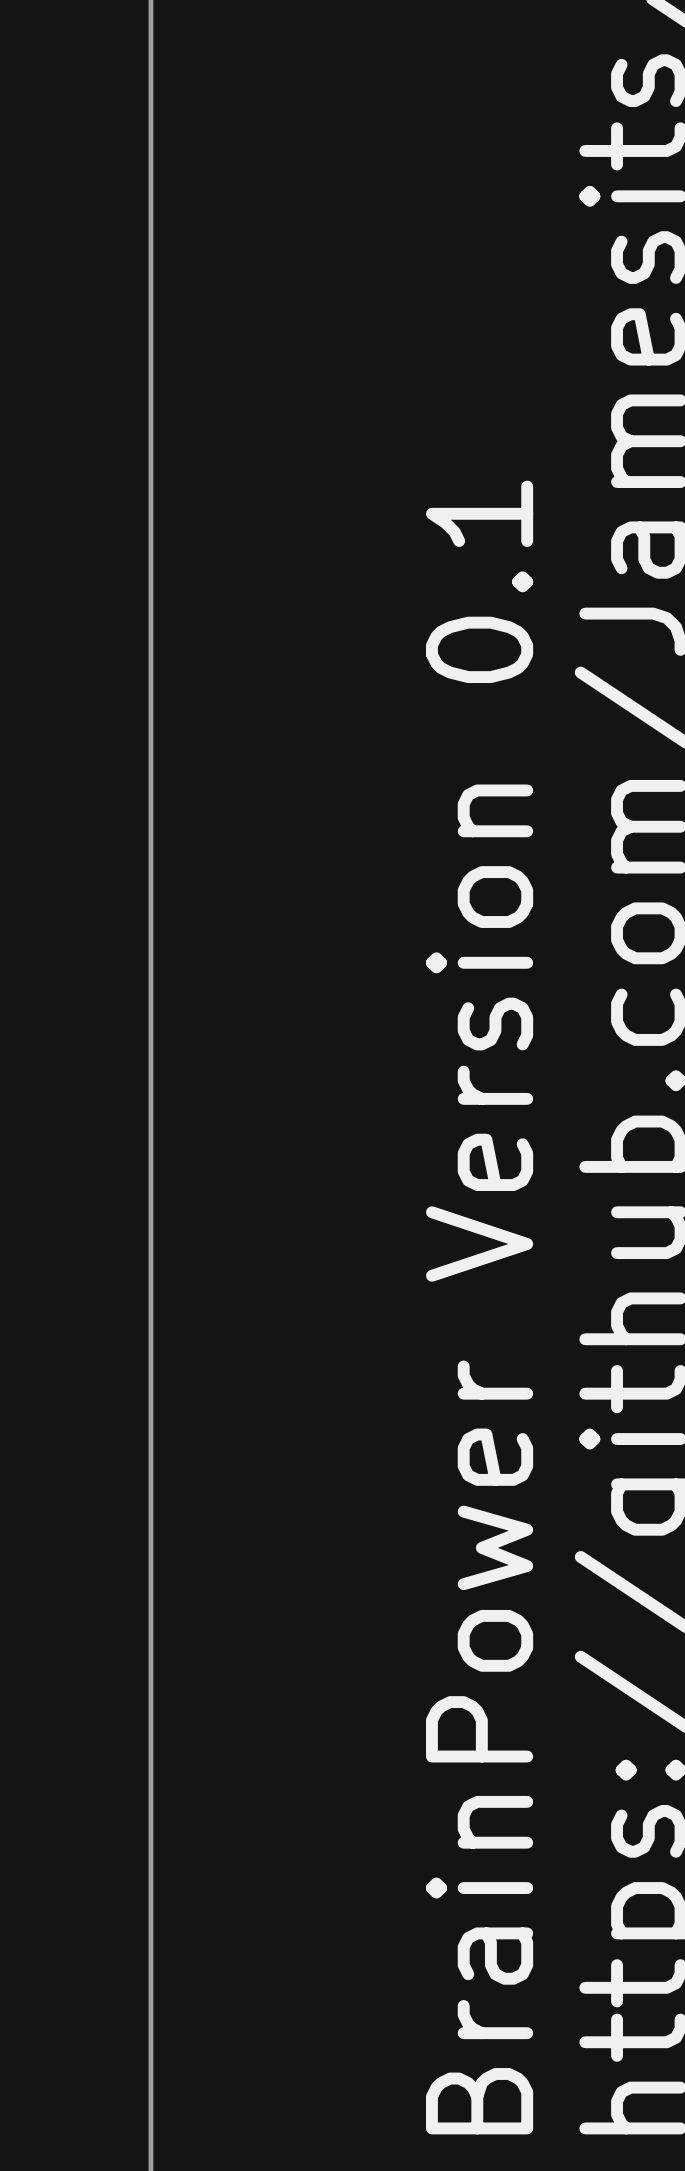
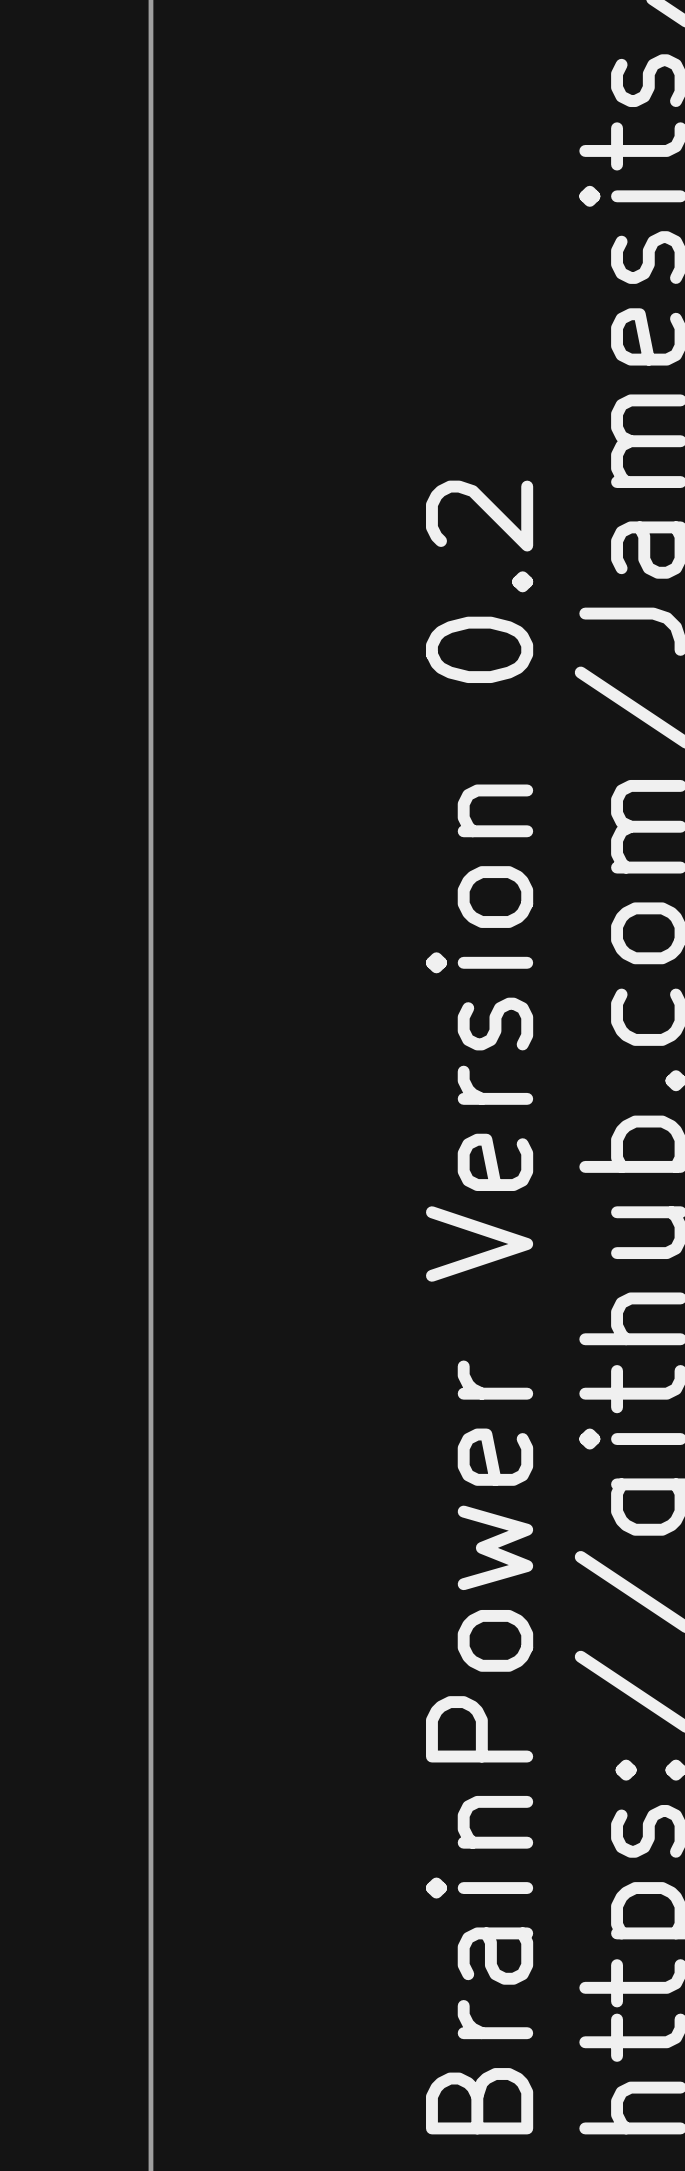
text: BrainPower Version 0.1 (479, 1307) -> BrainPower Version 0.2 (479, 1307)

